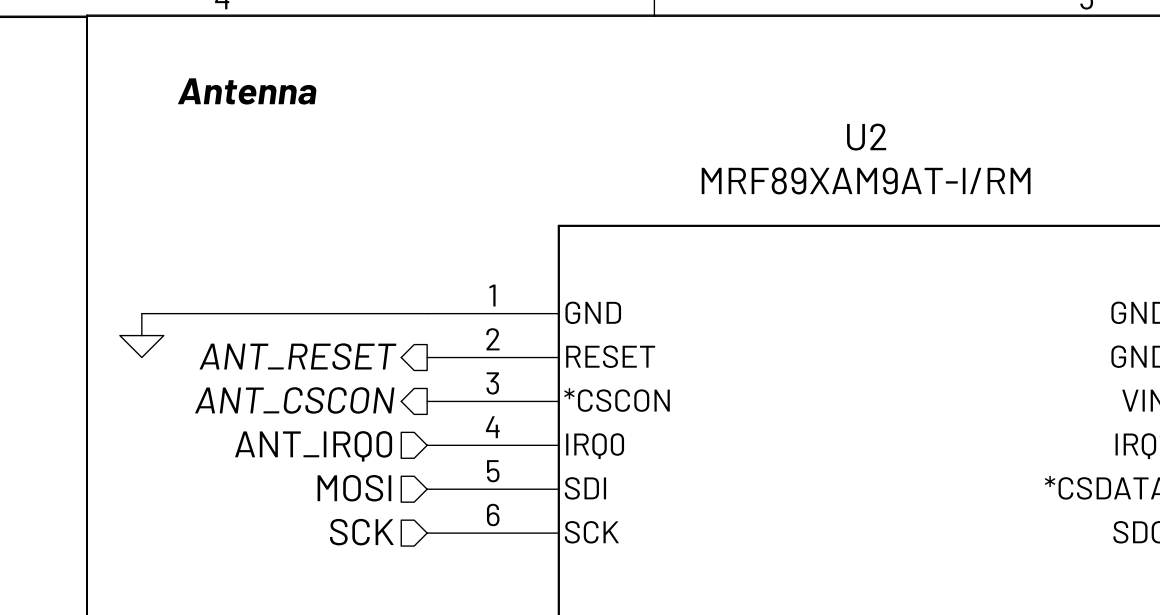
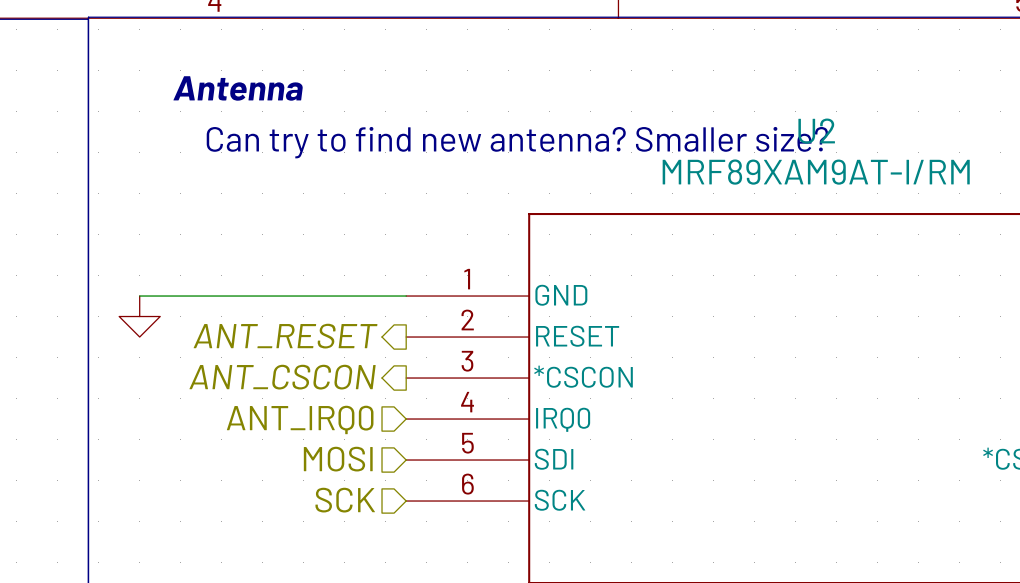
text: none -> Can try to find new antenna? Smaller size? (517, 142)

